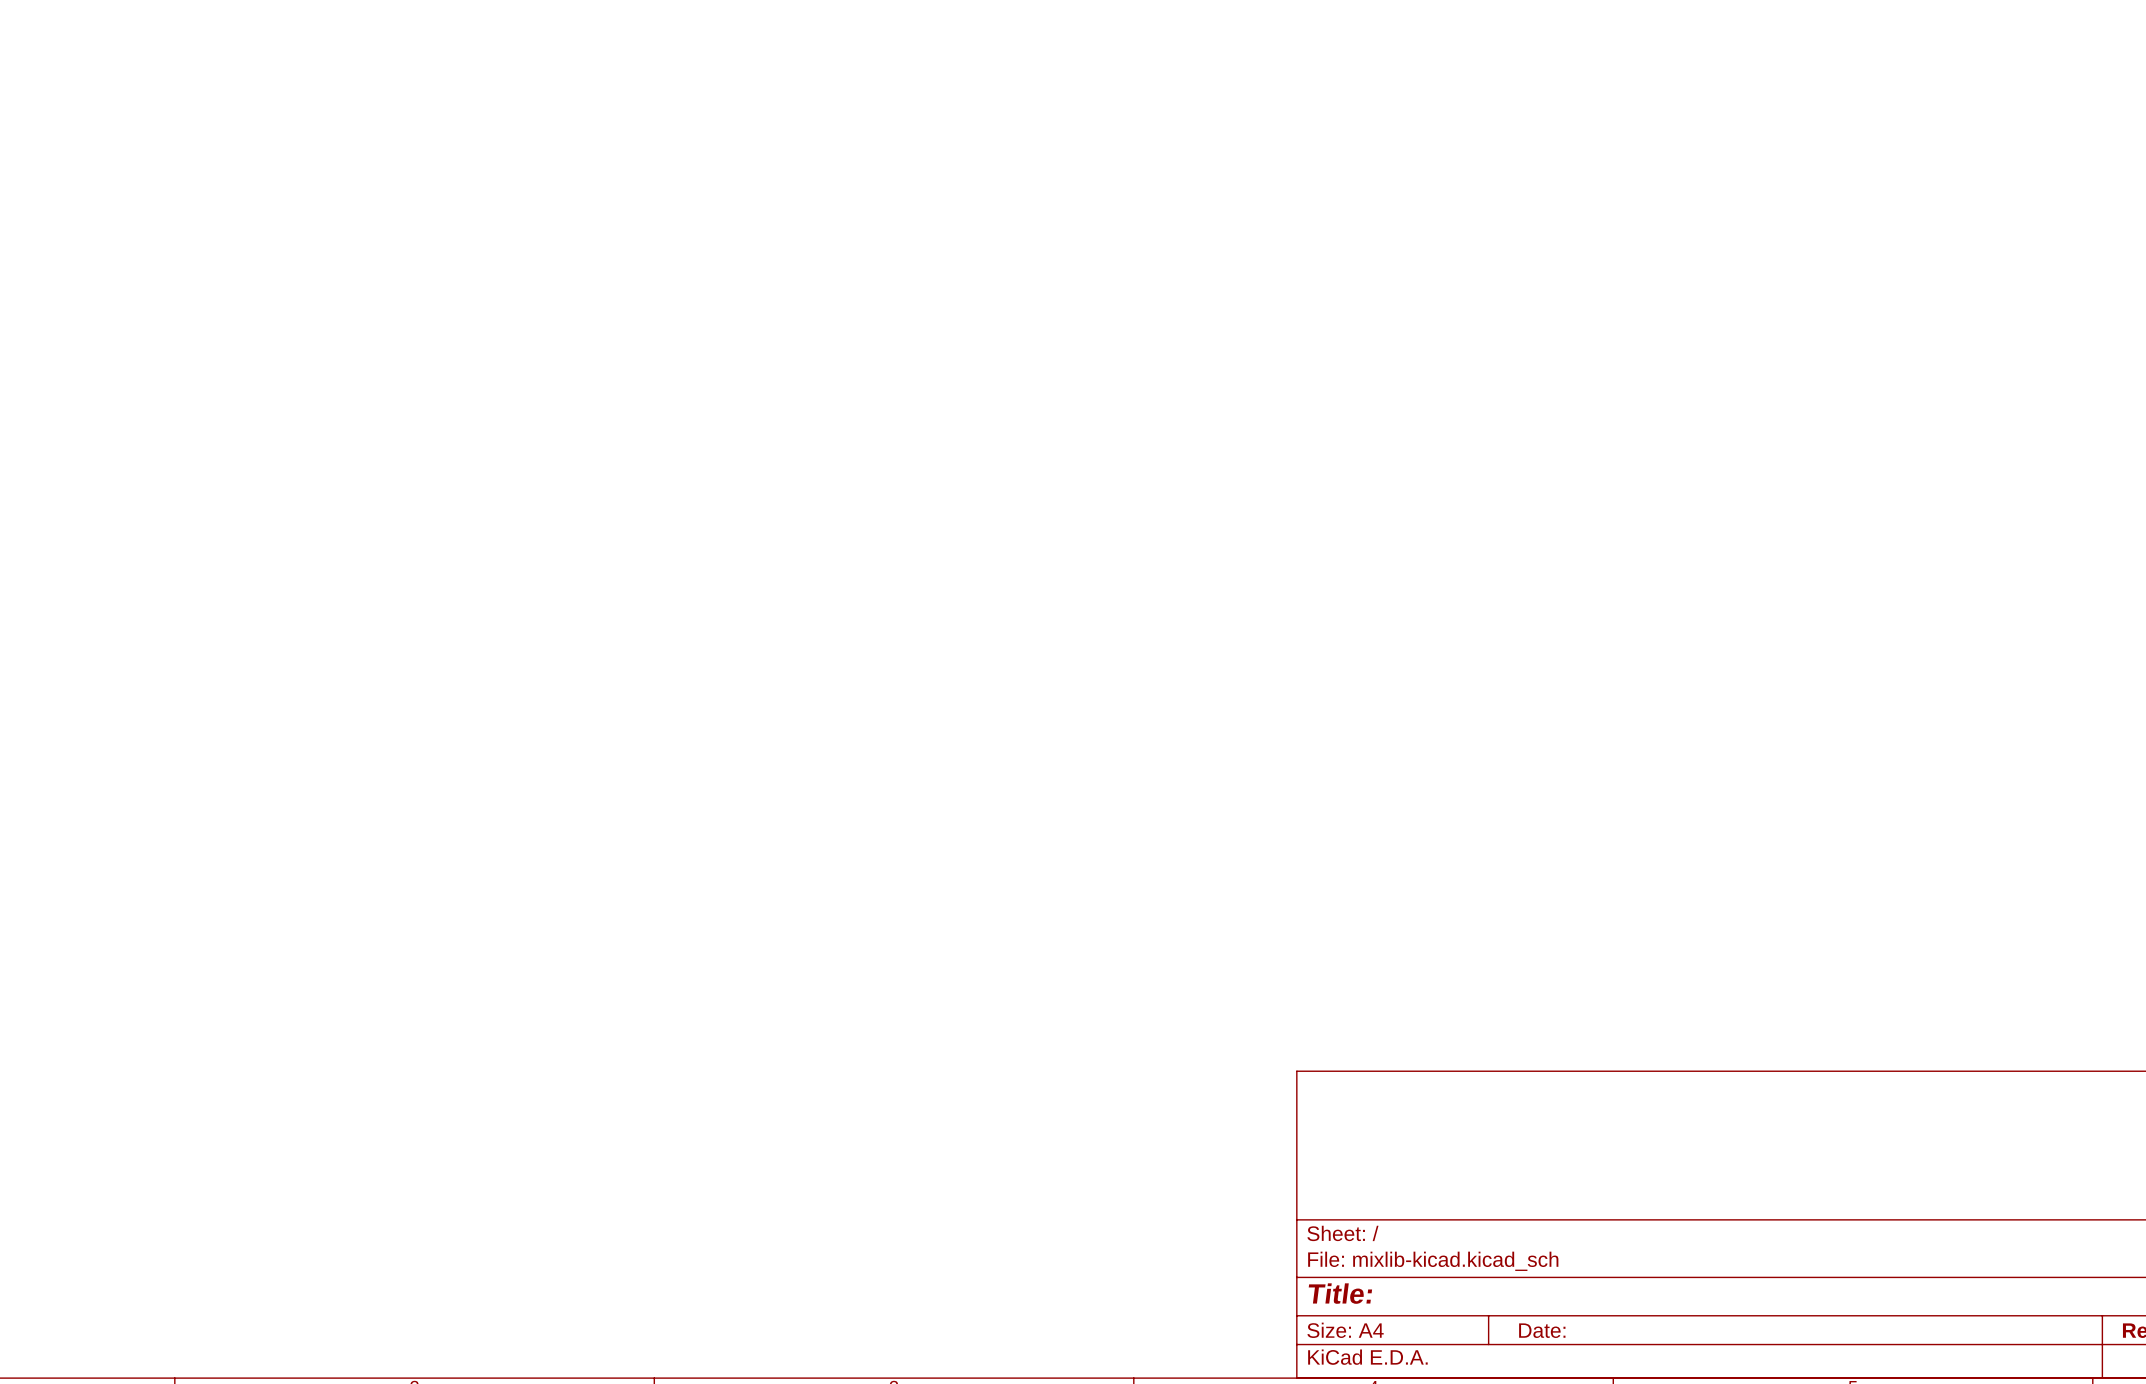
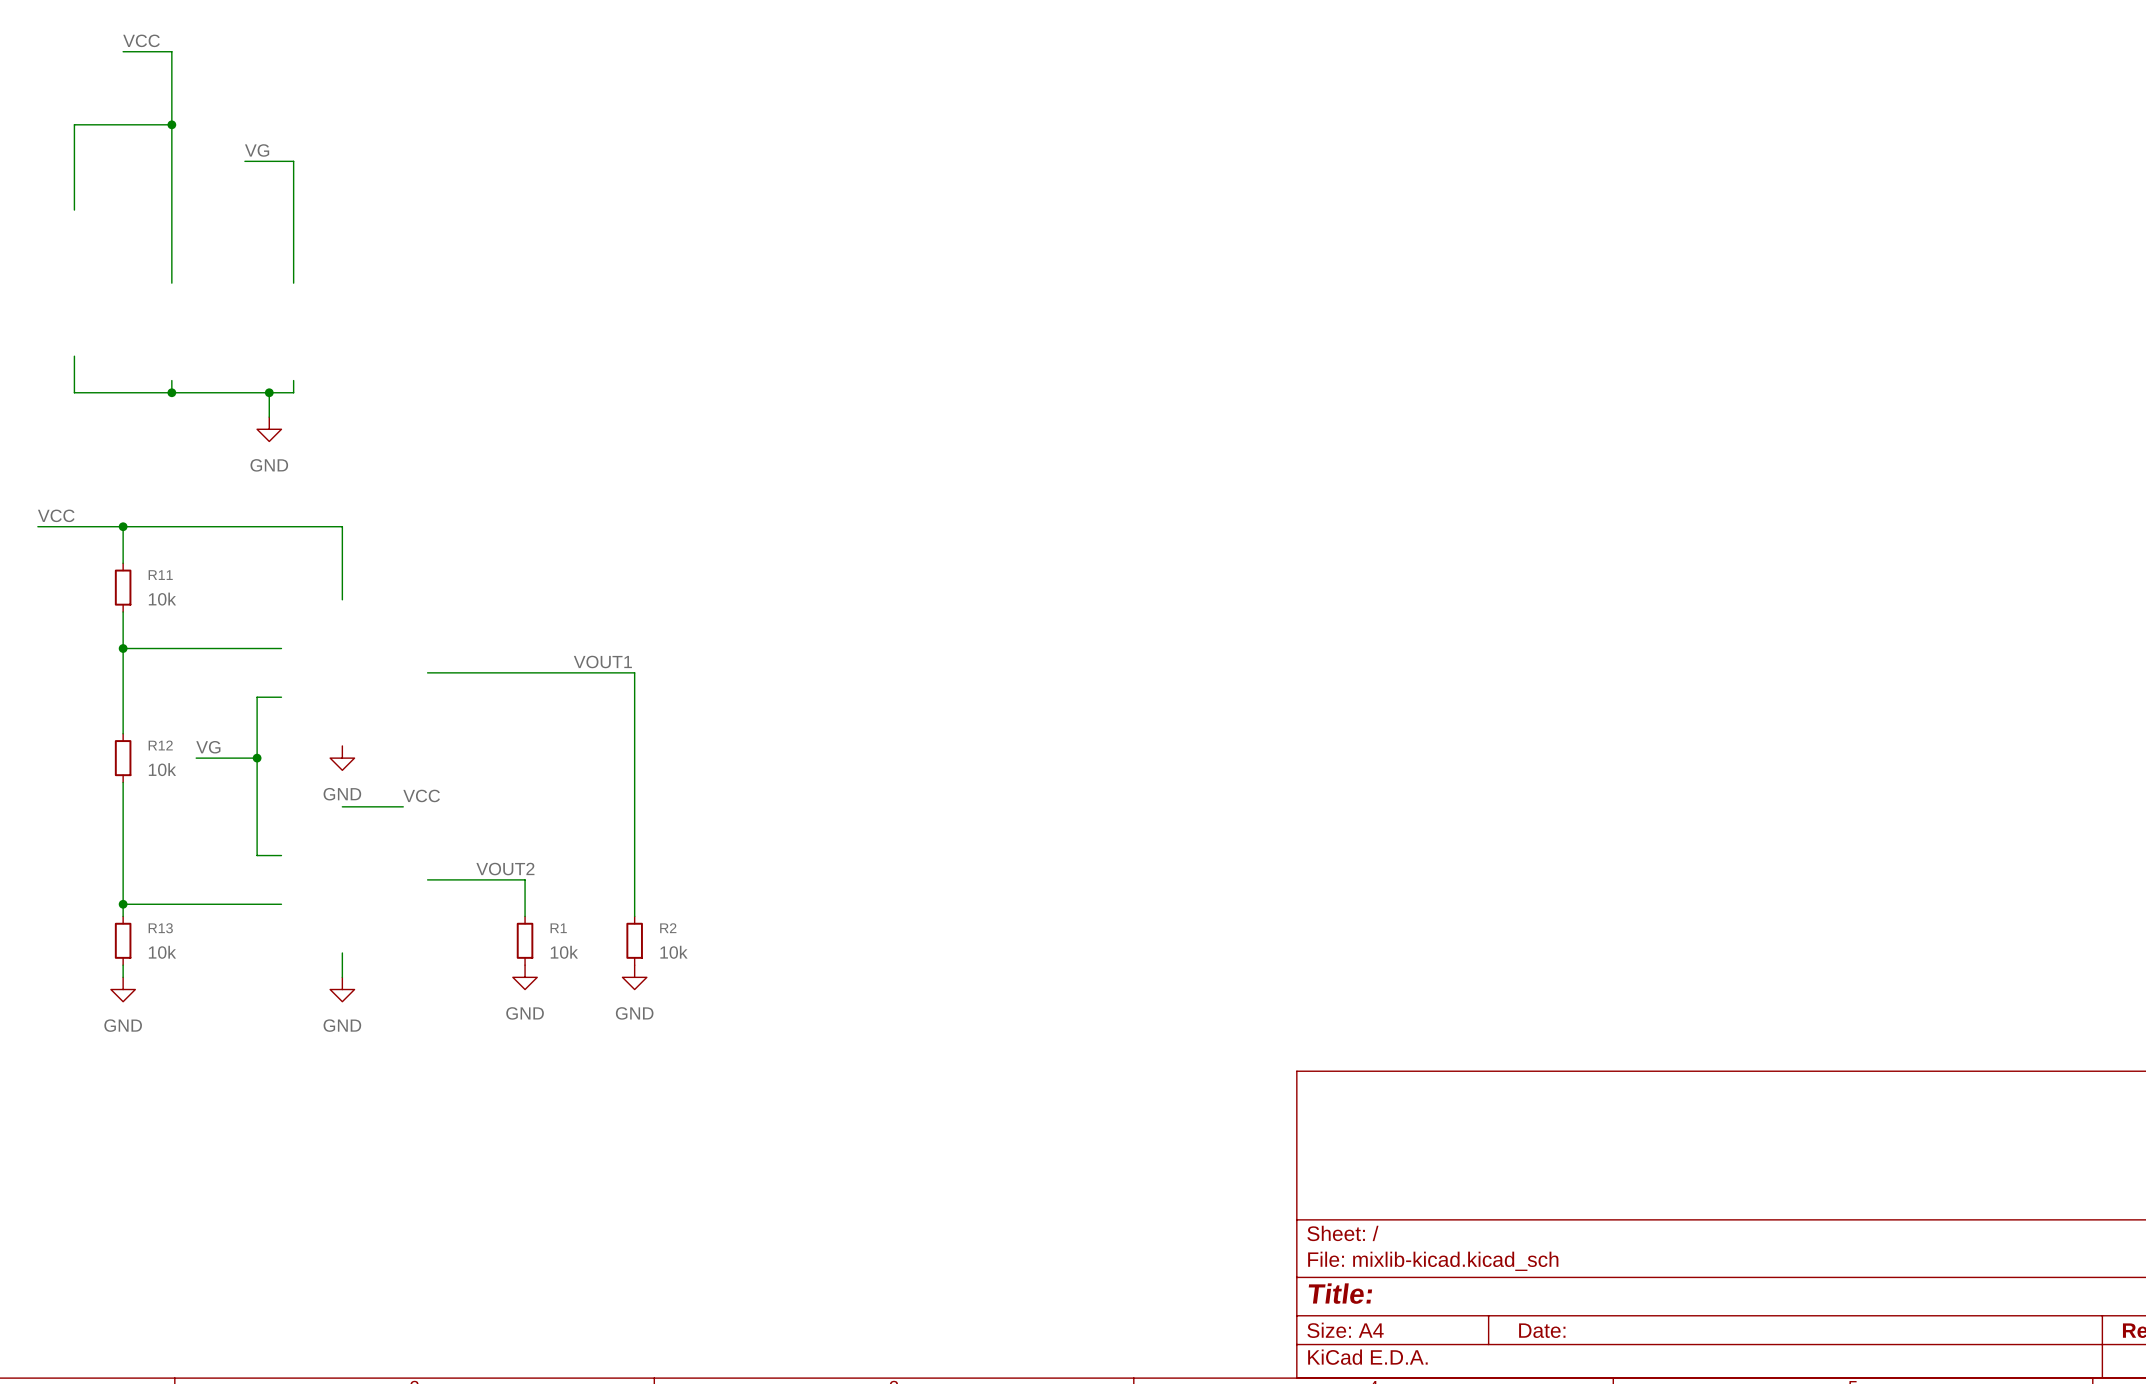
label: none -> VCC (141, 40)
wire: none -> (123, 51) (171, 51) (171, 283)
wire: none -> (171, 124) (74, 124) (74, 210)
junction: none -> (171, 124)
label: none -> VG (257, 150)
wire: none -> (244, 161) (293, 161) (293, 283)
wire: none -> (74, 356) (74, 392) (293, 392) (293, 380)
wire: none -> (171, 380) (171, 392)
junction: none -> (171, 392)
wire: none -> (269, 392) (269, 417)
junction: none -> (269, 392)
power symbol: none -> GND (269, 429)
label: none -> VCC (56, 515)
wire: none -> (37, 526) (342, 526) (342, 599)
wire: none -> (123, 526) (123, 563)
junction: none -> (123, 526)
R11: none -> 10k (123, 587)
wire: none -> (123, 611) (123, 733)
wire: none -> (123, 648) (281, 648)
junction: none -> (123, 648)
label: none -> VOUT1 (602, 661)
wire: none -> (427, 672) (634, 672) (634, 916)
wire: none -> (281, 697) (257, 697) (257, 855) (281, 855)
label: none -> VG (208, 747)
R12: none -> 10k (123, 758)
wire: none -> (196, 758) (257, 758)
junction: none -> (257, 758)
power symbol: none -> GND (342, 758)
wire: none -> (123, 782) (123, 916)
label: none -> VCC (421, 795)
wire: none -> (342, 806) (403, 806)
label: none -> VOUT2 (505, 869)
wire: none -> (427, 879) (525, 879) (525, 916)
wire: none -> (123, 904) (281, 904)
junction: none -> (123, 904)
R13: none -> 10k (123, 940)
R1: none -> 10k (525, 940)
R2: none -> 10k (634, 940)
wire: none -> (342, 952) (342, 977)
wire: none -> (123, 965) (123, 977)
power symbol: none -> GND (525, 977)
power symbol: none -> GND (634, 977)
power symbol: none -> GND (123, 989)
power symbol: none -> GND (342, 989)

